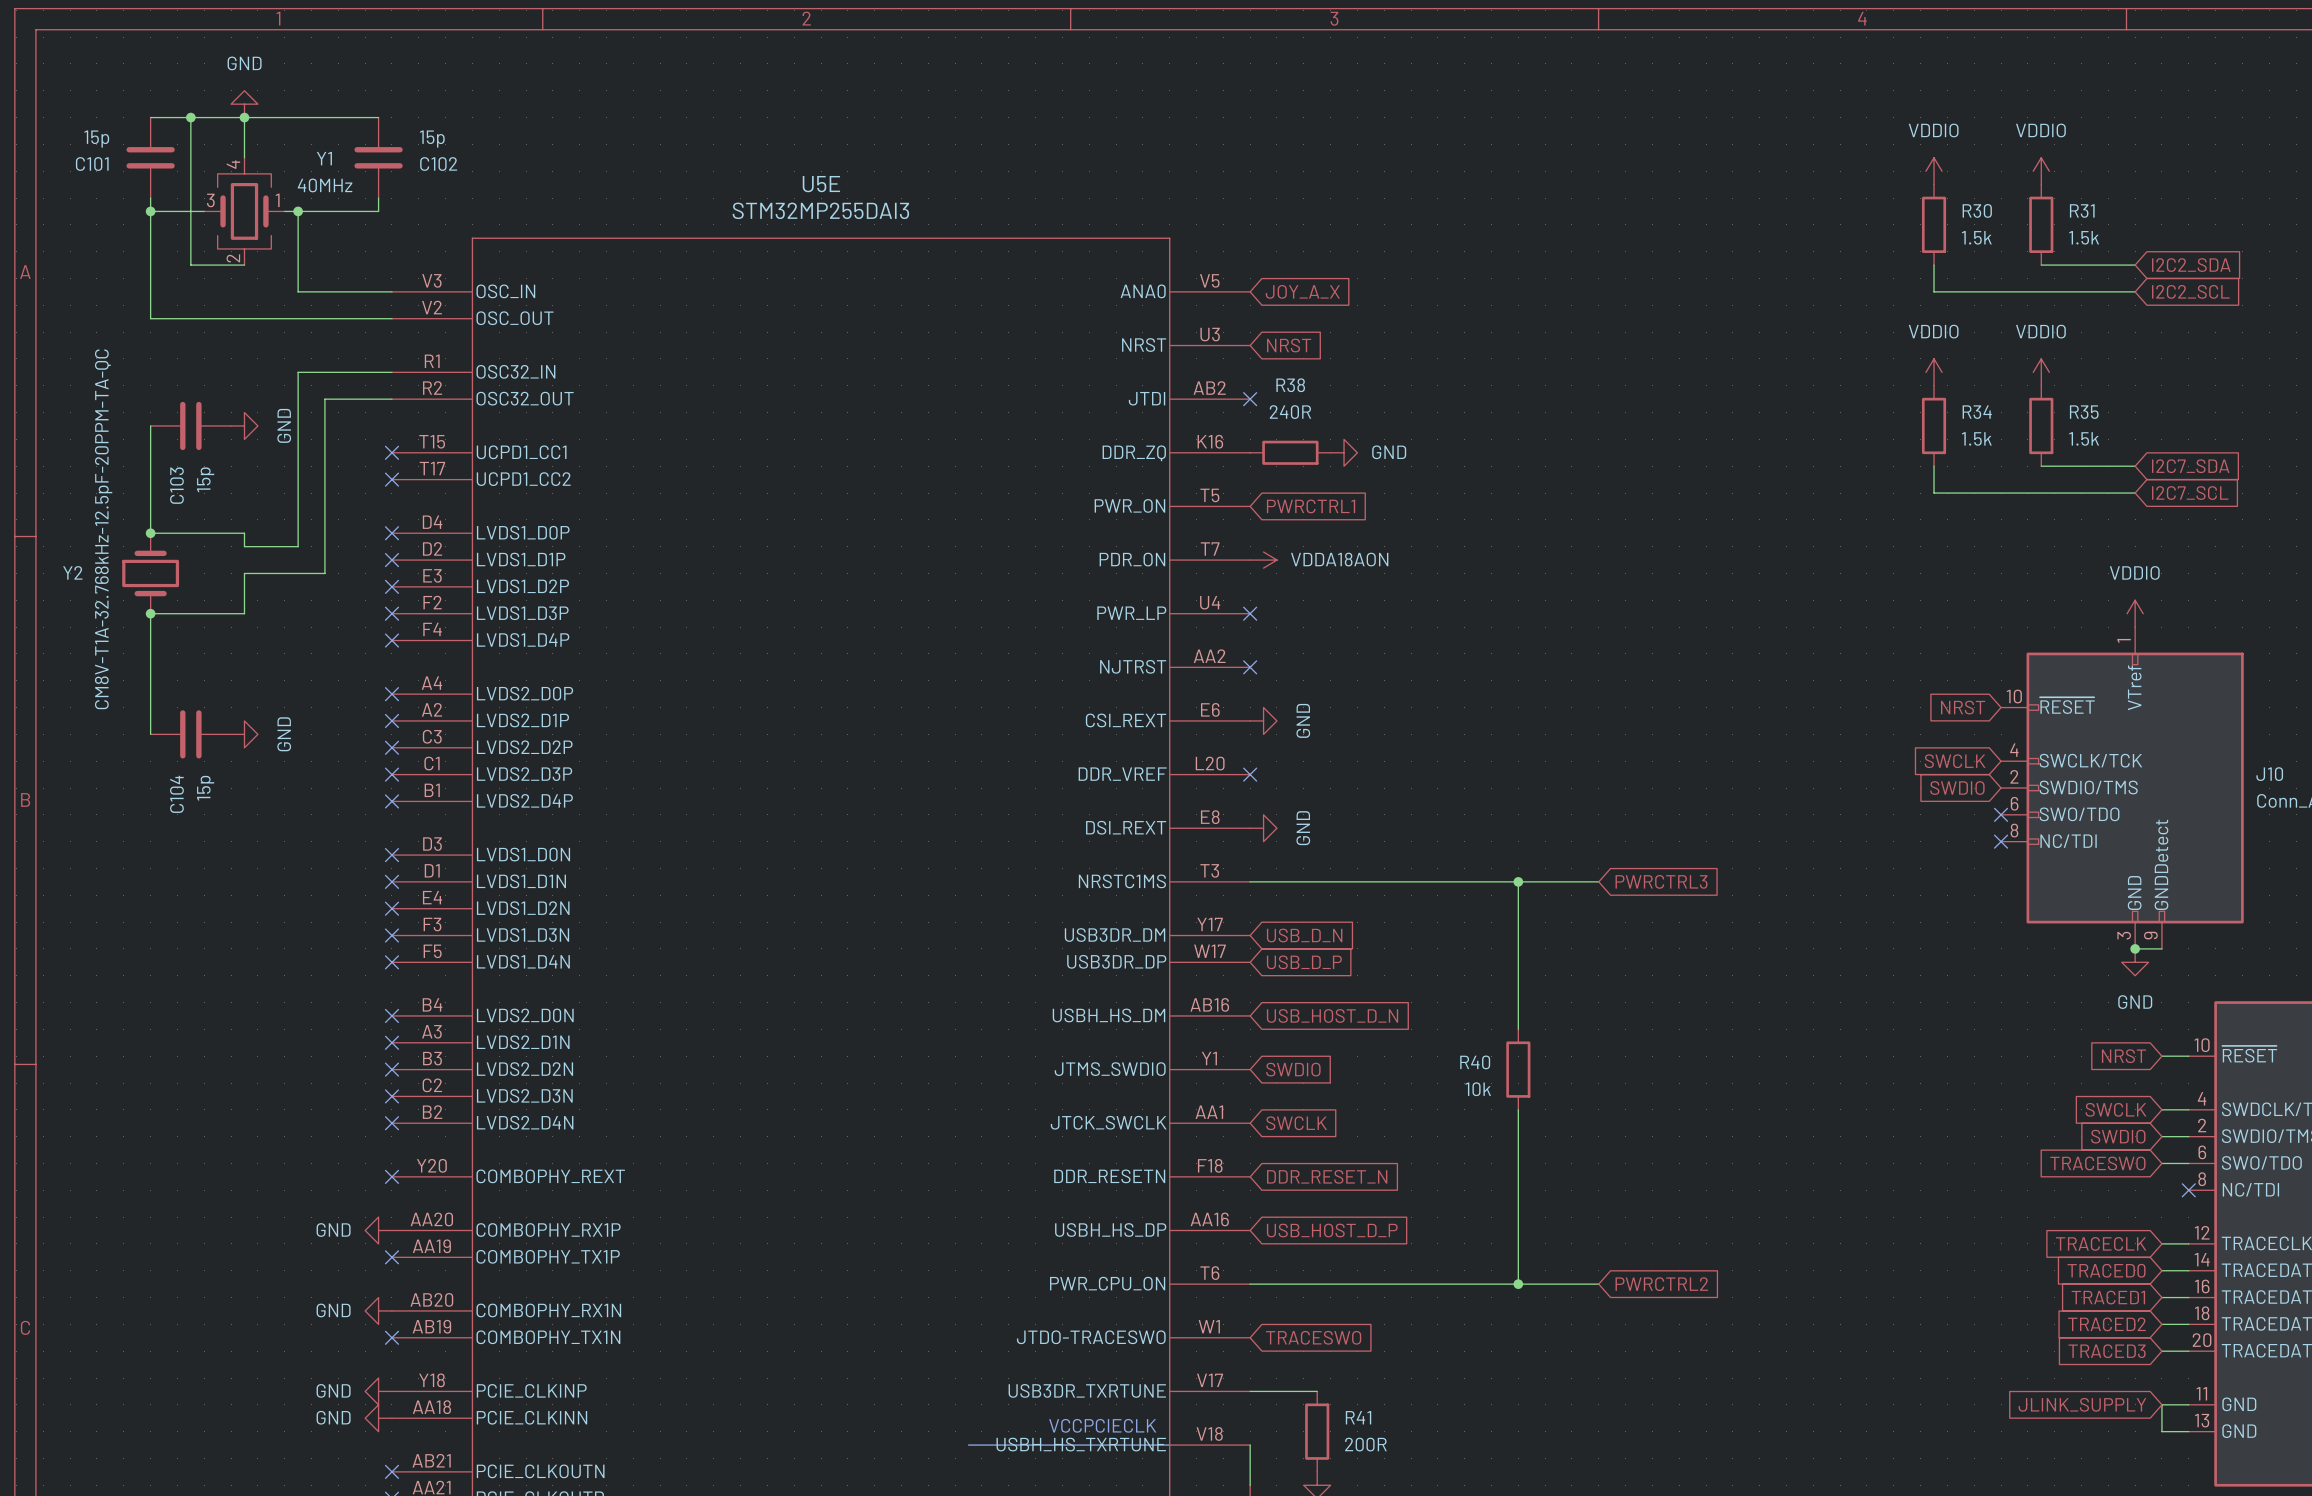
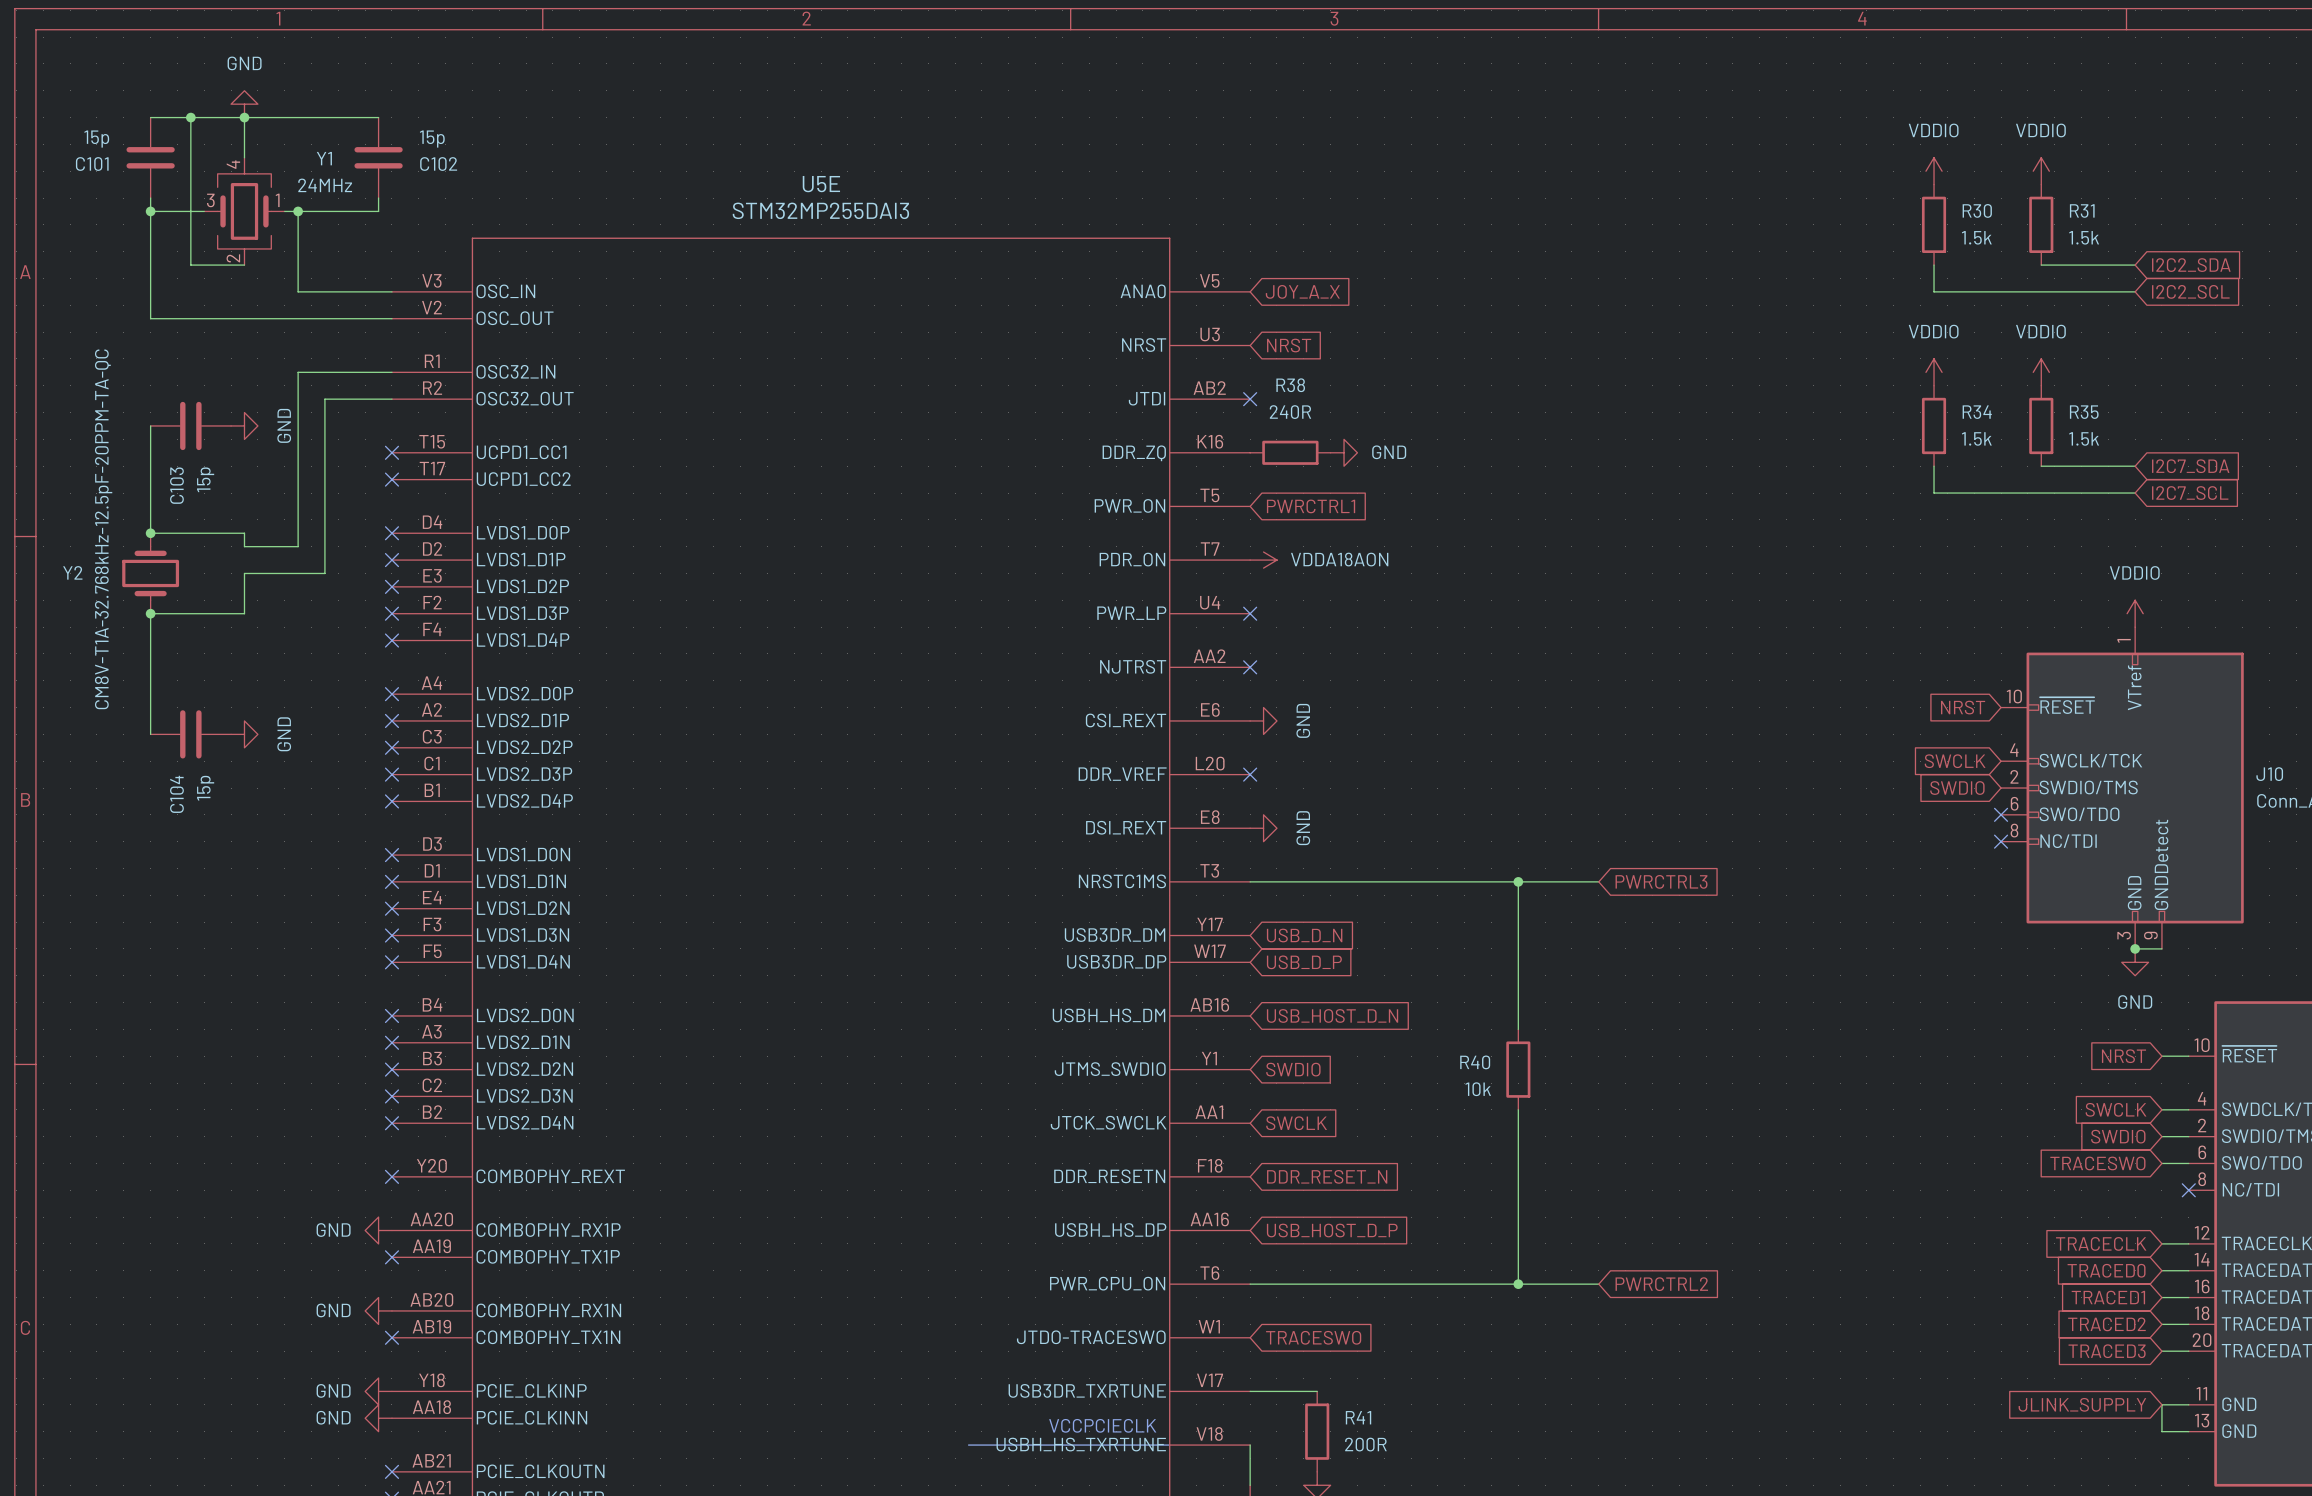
Y1 value: 40MHz (325, 185) -> 24MHz (325, 185)

